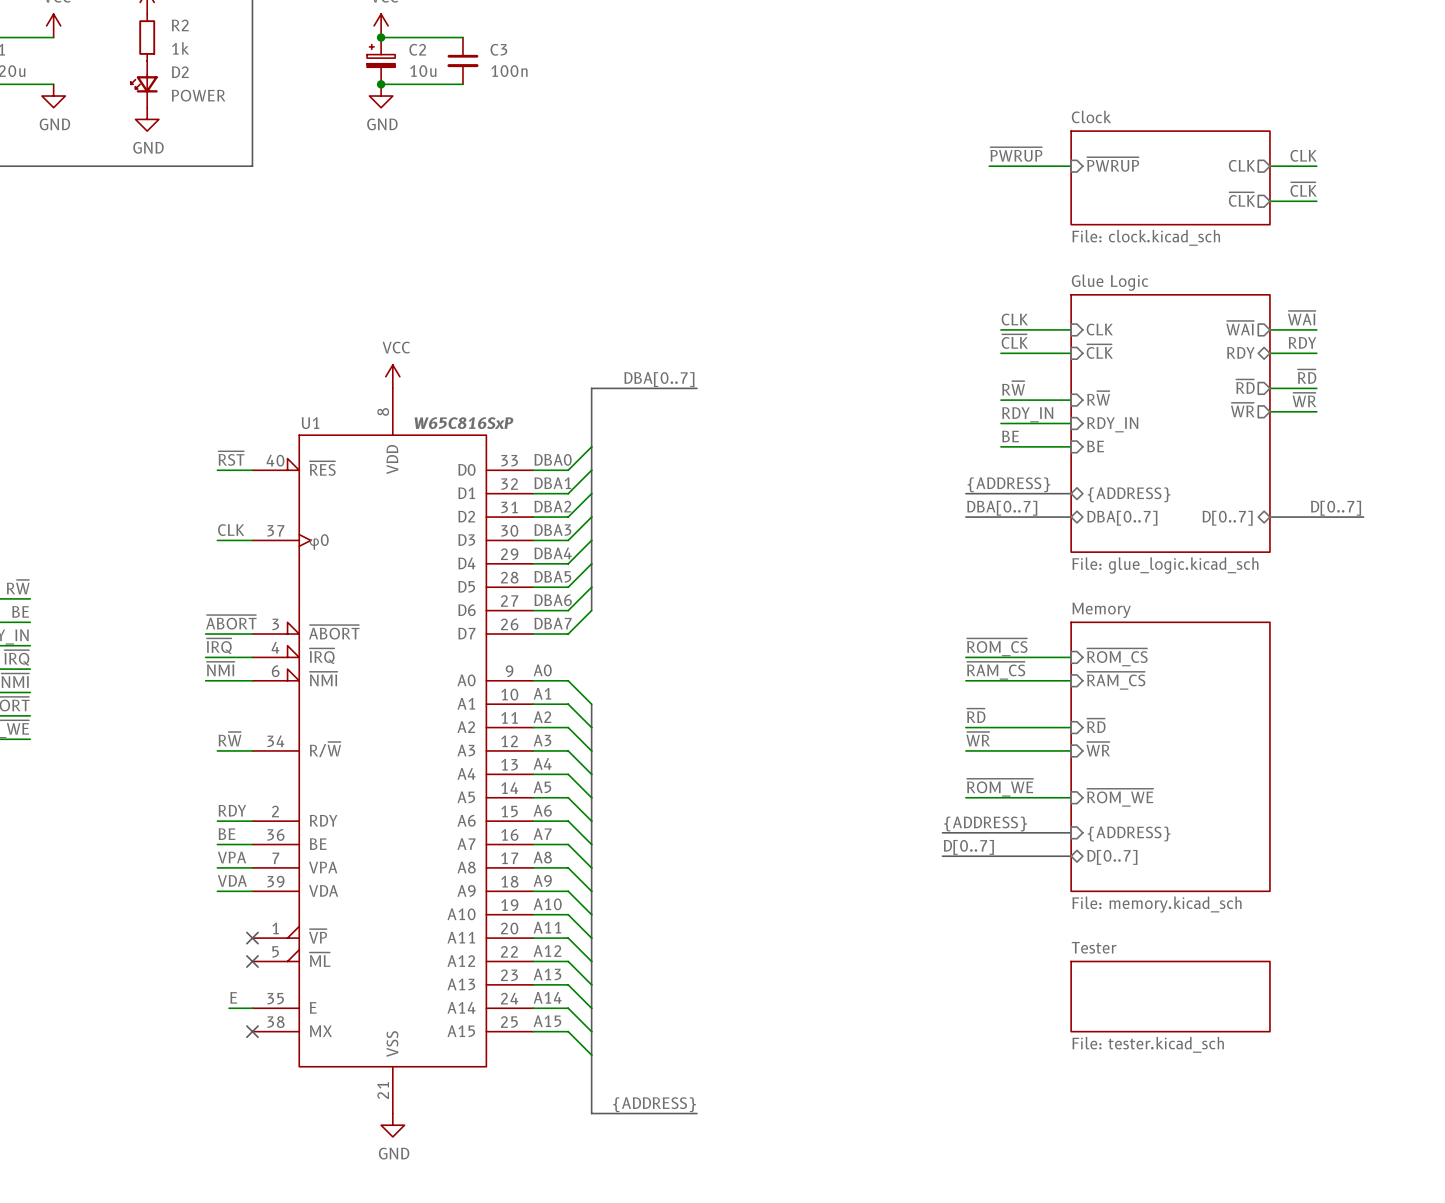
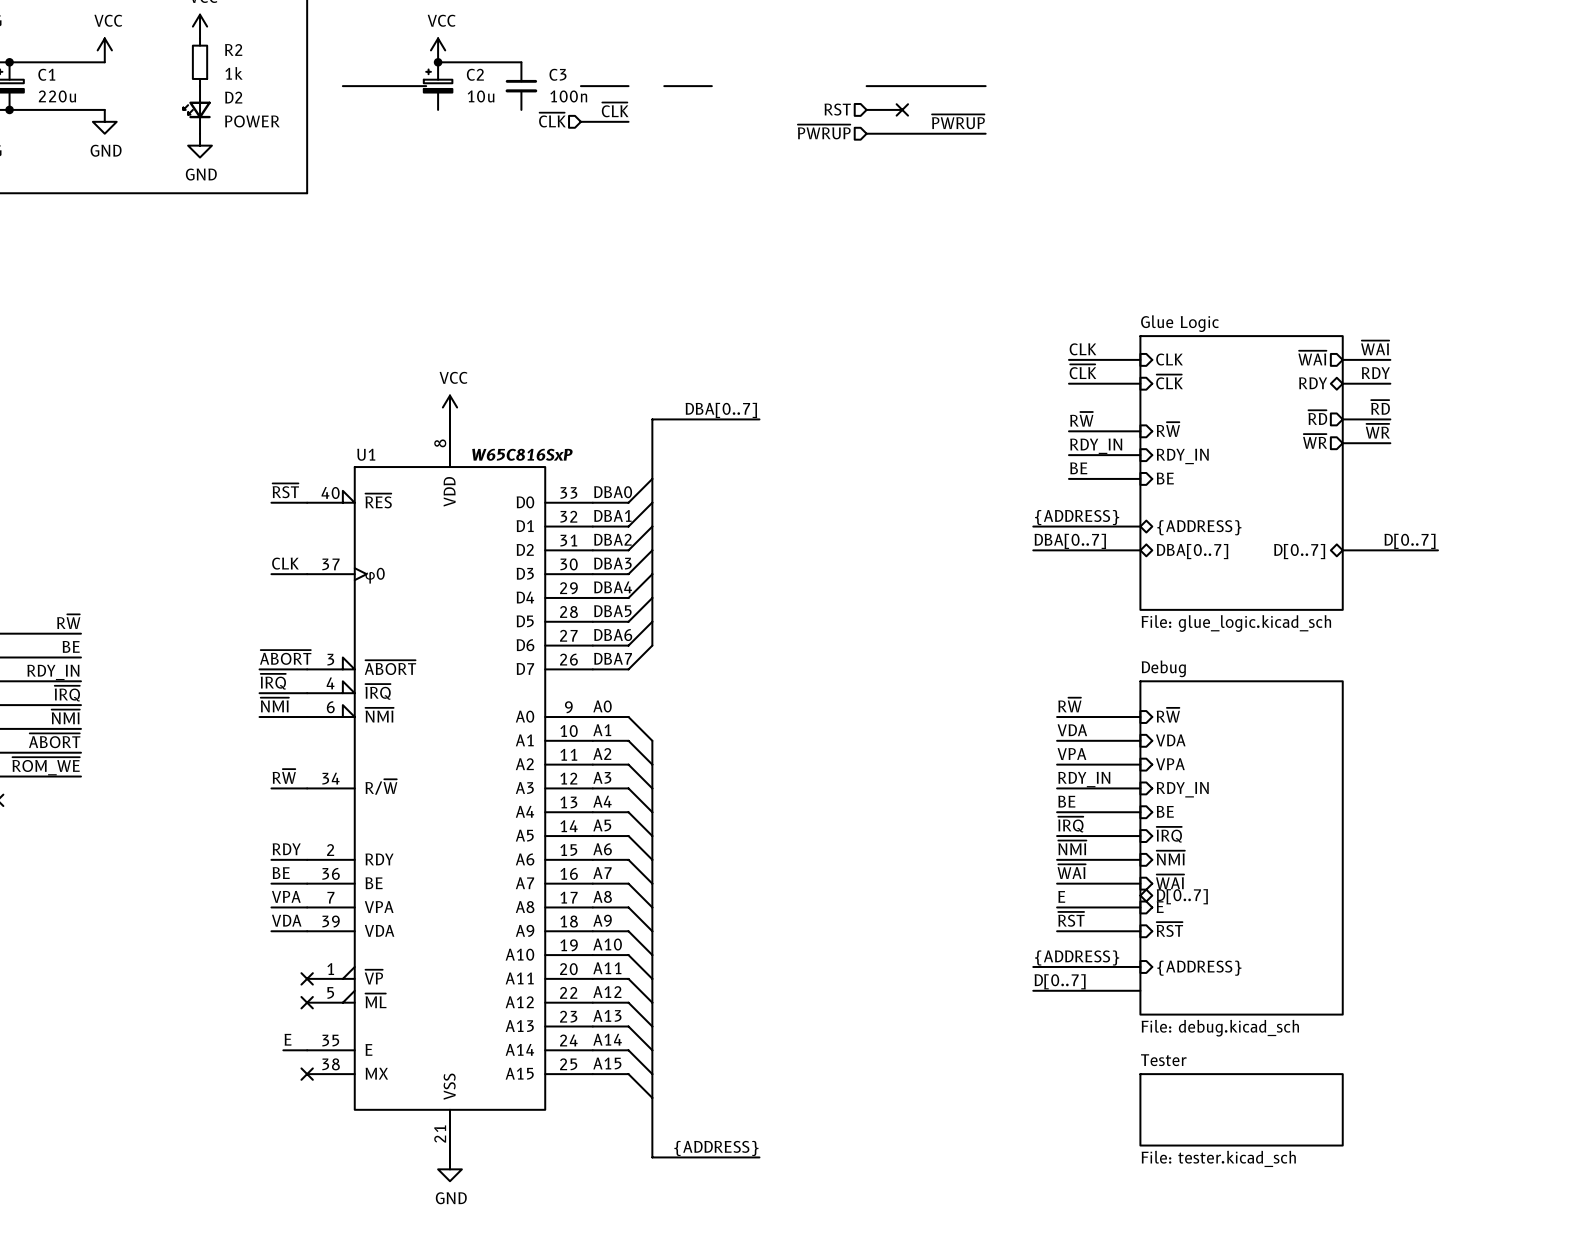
wire: none -> (580, 86) (628, 86)
wire: none -> (664, 86) (711, 86)
wire: none -> (866, 86) (985, 86)
sheet pin: none -> RST (837, 109)
wire: (381, 84) (462, 84) -> (342, 86) (426, 86)
junction: (381, 84) -> none
label: none -> ~{CLK} (615, 109)
wire: none -> (866, 109) (902, 109)
no-connect mark: none -> (902, 109)
sheet pin: none -> ~{CLK} (552, 120)
power symbol: GND (381, 96) -> none
wire: none -> (580, 121) (628, 121)
sheet pin: none -> ~{PWRUP} (824, 131)
wire: none -> (866, 133) (985, 133)
label position: ~{PWRUP} (1016, 154) -> ~{PWRUP} (958, 121)
label: CLK (1303, 155) -> none
sheet pin: ~{PWRUP} (1113, 164) -> none
sheet pin: CLK (1241, 165) -> none
wire: (989, 166) (1071, 166) -> none
wire: (1269, 166) (1316, 166) -> none
sheet Clock: File: clock.kicad_sch (1170, 177) -> none
label: ~{CLK} (1303, 189) -> none
sheet pin: ~{CLK} (1241, 199) -> none
wire: (1269, 201) (1316, 201) -> none
sheet Glue Logic: File: glue_logic.kicad_sch (1170, 423) -> none
sheet Glue Logic: none -> File: glue_logic.kicad_sch (1241, 472)
label: ~{ROM_CS} (997, 647) -> none
wire: (965, 657) (1071, 657) -> none
sheet pin: ~{ROM_CS} (1117, 657) -> none
label: none -> R~{W} (1069, 705)
label: ~{RAM_CS} (996, 670) -> none
wire: (965, 680) (989, 680) -> none
sheet pin: ~{RAM_CS} (1116, 680) -> R~{W} (1168, 715)
label: none -> VDA (1072, 730)
sheet pin: none -> VDA (1170, 740)
wire: none -> (1057, 740) (1140, 740)
label: ~{RD} (976, 715) -> none
label: none -> VPA (1071, 754)
sheet pin: ~{RD} (1096, 725) -> VPA (1170, 764)
wire: (965, 727) (989, 727) -> none
label: ~{WR} (978, 739) -> none
label: none -> RDY_IN (1084, 779)
sheet pin: ~{WR} (1098, 749) -> RDY_IN (1182, 789)
wire: (965, 750) (989, 750) -> none
sheet Memory: File: memory.kicad_sch (1170, 756) -> none
label: none -> BE (1066, 801)
sheet pin: none -> BE (1165, 811)
wire: none -> (1057, 812) (1140, 812)
label: none -> ~{IRQ} (1070, 824)
label: ~{ROM_WE} (1000, 787) -> none
wire: (965, 797) (989, 797) -> none
sheet pin: ~{ROM_WE} (1120, 797) -> ~{IRQ} (1169, 834)
label: none -> ~{NMI} (1072, 847)
sheet Debug: none -> File: debug.kicad_sch (1241, 847)
sheet pin: none -> ~{NMI} (1170, 858)
wire: none -> (1057, 859) (1140, 859)
label position: {ADDRESS} (985, 824) -> {ADDRESS} (1077, 958)
bus: (942, 832) (1071, 832) -> none
label: none -> ~{WAI} (1071, 871)
sheet pin position: {ADDRESS} (1129, 834) -> {ADDRESS} (1199, 968)
sheet pin: none -> ~{WAI} (1170, 881)
wire: none -> (1057, 883) (1140, 883)
label position: D[0..7] (968, 847) -> D[0..7] (1060, 981)
bus: (942, 856) (1071, 856) -> none
label: none -> E (1061, 896)
wire: none -> (1057, 907) (1140, 907)
sheet pin: none -> E (1160, 907)
label: none -> ~{RST} (1071, 919)
sheet pin: none -> ~{RST} (1169, 929)
wire: none -> (1057, 931) (1140, 931)
bus: none -> (1033, 966) (1140, 966)
bus: none -> (1033, 990) (1140, 990)
sheet Tester position: (1170, 996) -> (1241, 1109)

